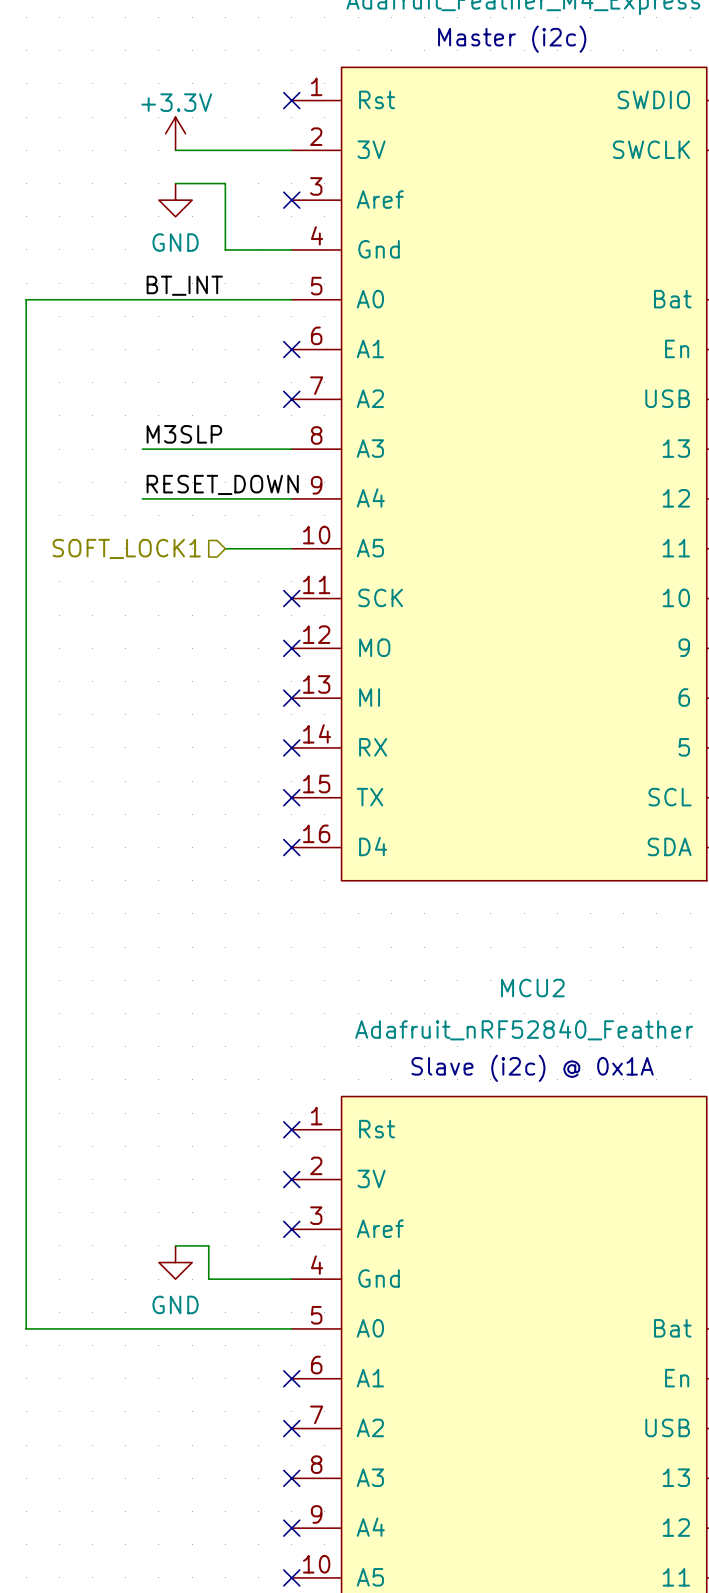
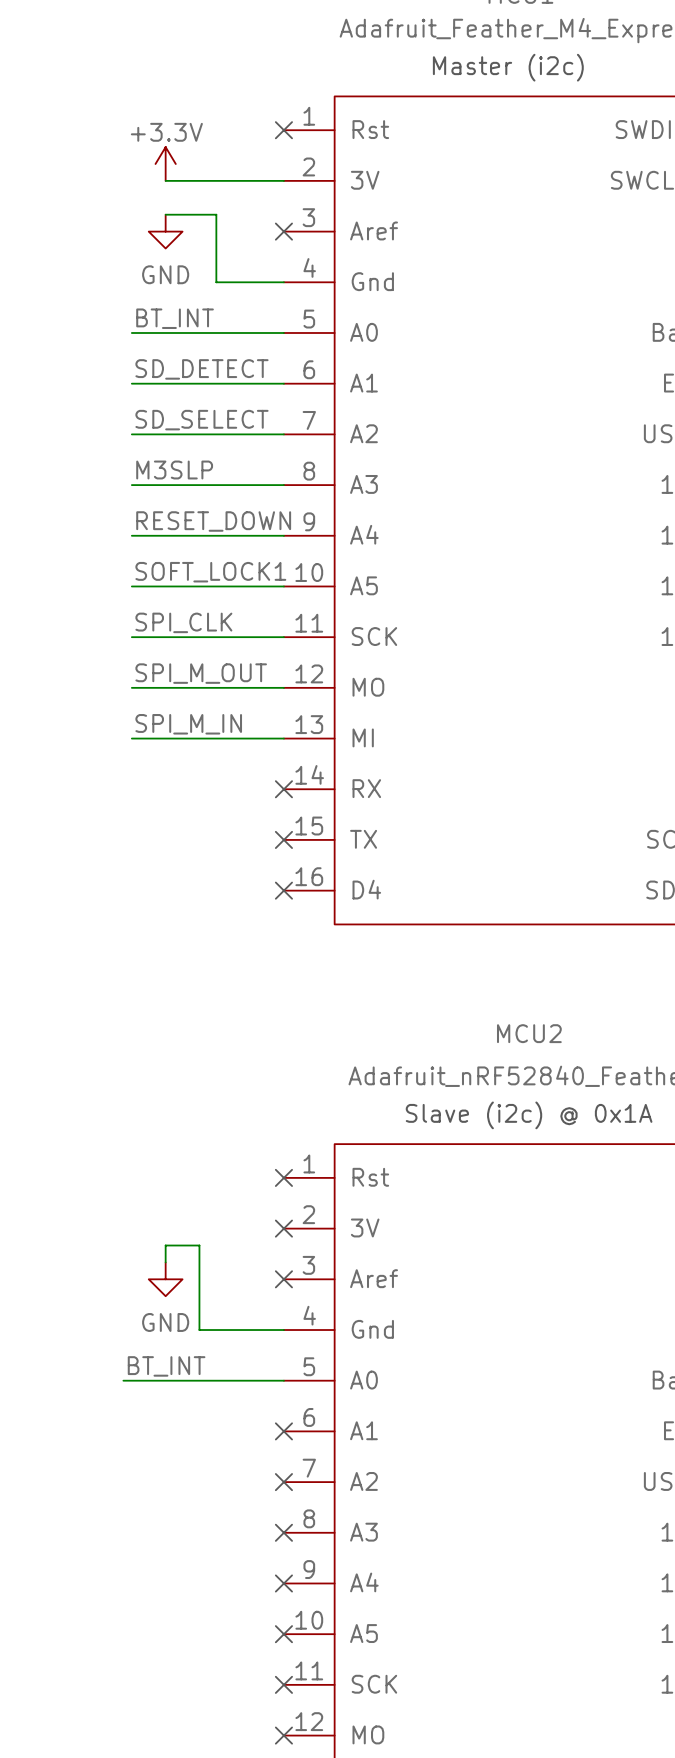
wire: (142, 299) (26, 299) (26, 1328) (134, 1328) -> none
label: none -> SD_DETECT (201, 369)
wire: none -> (131, 383) (283, 383)
no-connect mark: (291, 349) -> none
label: none -> SD_SELECT (201, 420)
wire: none -> (131, 434) (283, 434)
no-connect mark: (291, 399) -> none
label: none -> SOFT_LOCK1 (210, 572)
hierarchical label: SOFT_LOCK1 (126, 548) -> none
wire: none -> (131, 586) (216, 586)
label: none -> SPI_CLK (183, 622)
wire: none -> (131, 637) (283, 637)
no-connect mark: (291, 598) -> none
label: none -> SPI_M_OUT (201, 673)
wire: none -> (131, 687) (283, 687)
no-connect mark: (291, 648) -> none
label: none -> SPI_M_IN (188, 724)
wire: none -> (131, 738) (283, 738)
no-connect mark: (291, 698) -> none
wire: (175, 1245) (208, 1245) -> (165, 1262) (165, 1245) (199, 1245) (199, 1296)
power symbol position: GND (175, 1262) -> GND (165, 1279)
label: none -> BT_INT (166, 1366)

